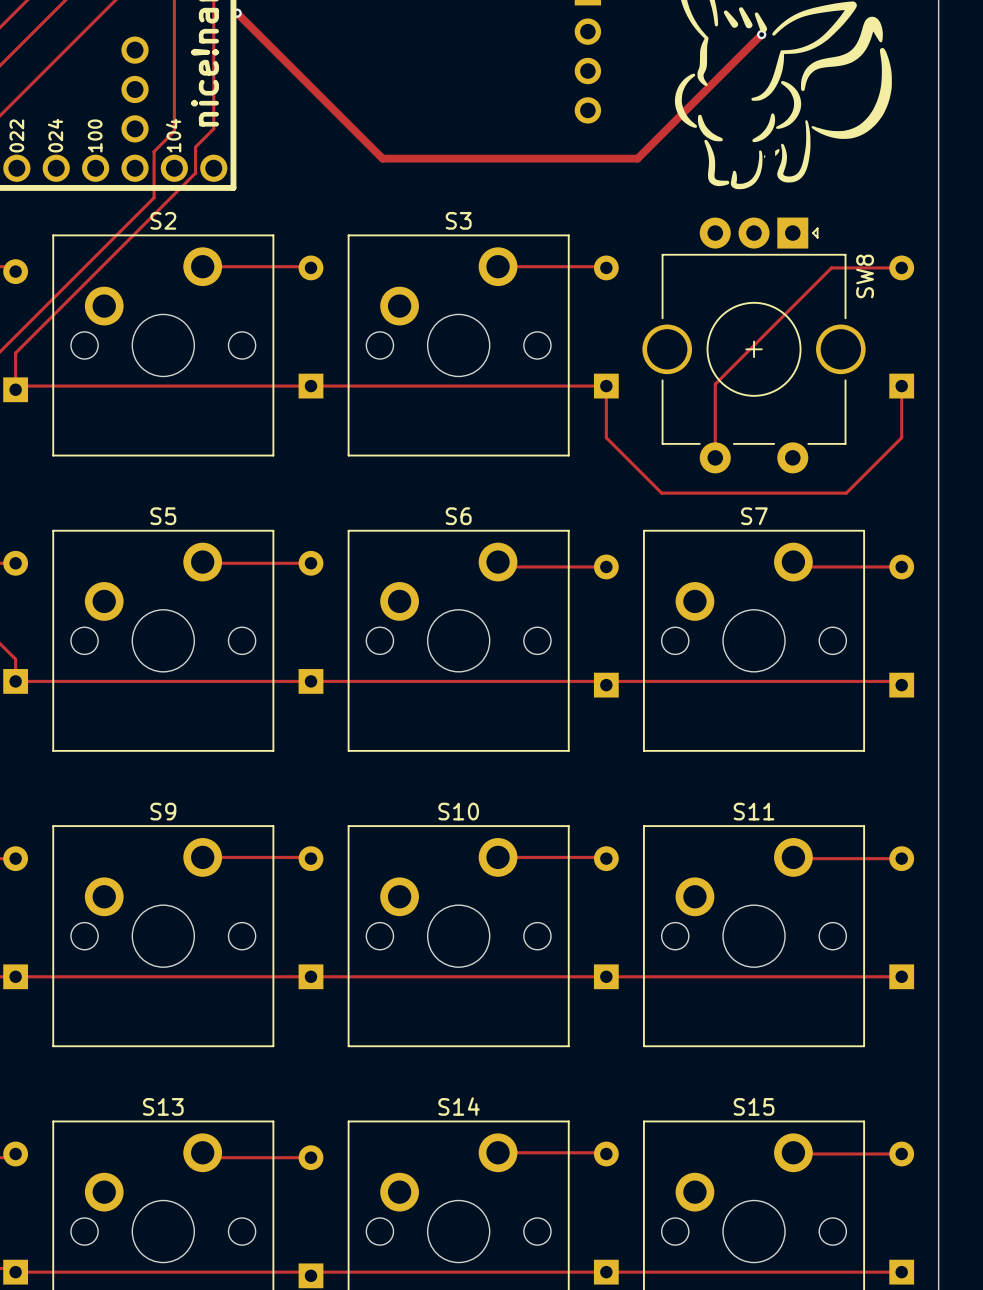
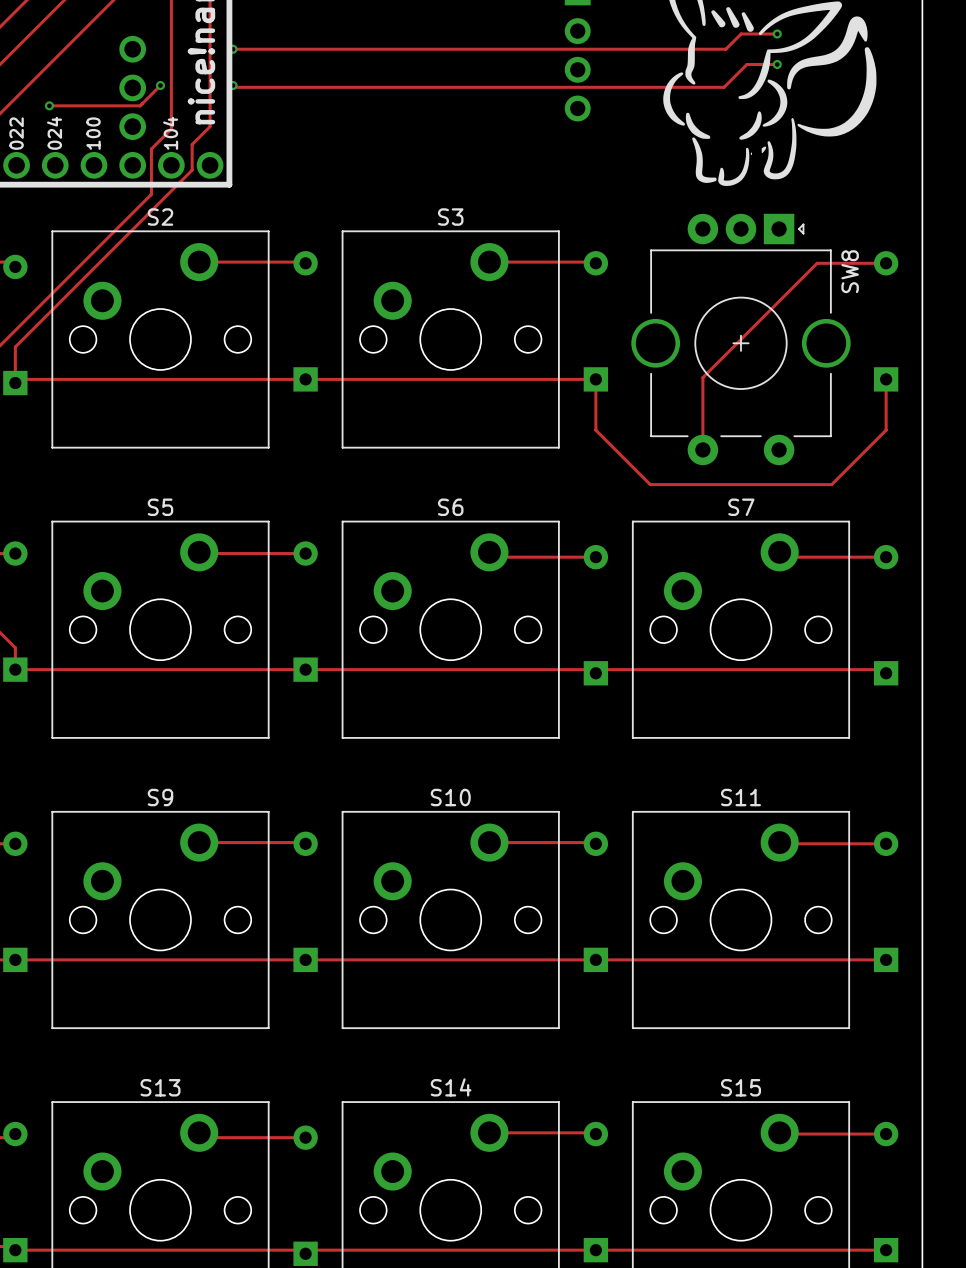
track: (237, 13) (382, 158) (637, 158) (761, 34) -> none
via: (237, 13) -> none
via: (761, 34) -> none
track: none -> (777, 34) (741, 34) (725, 49) (233, 49)
via: none -> (777, 34)
via: none -> (233, 49)
track: none -> (777, 64) (746, 64) (724, 87) (234, 87) (233, 85)
via: none -> (777, 64)
track: none -> (160, 85) (140, 105) (49, 105)
via: none -> (160, 85)
via: none -> (233, 85)
via: none -> (49, 105)

